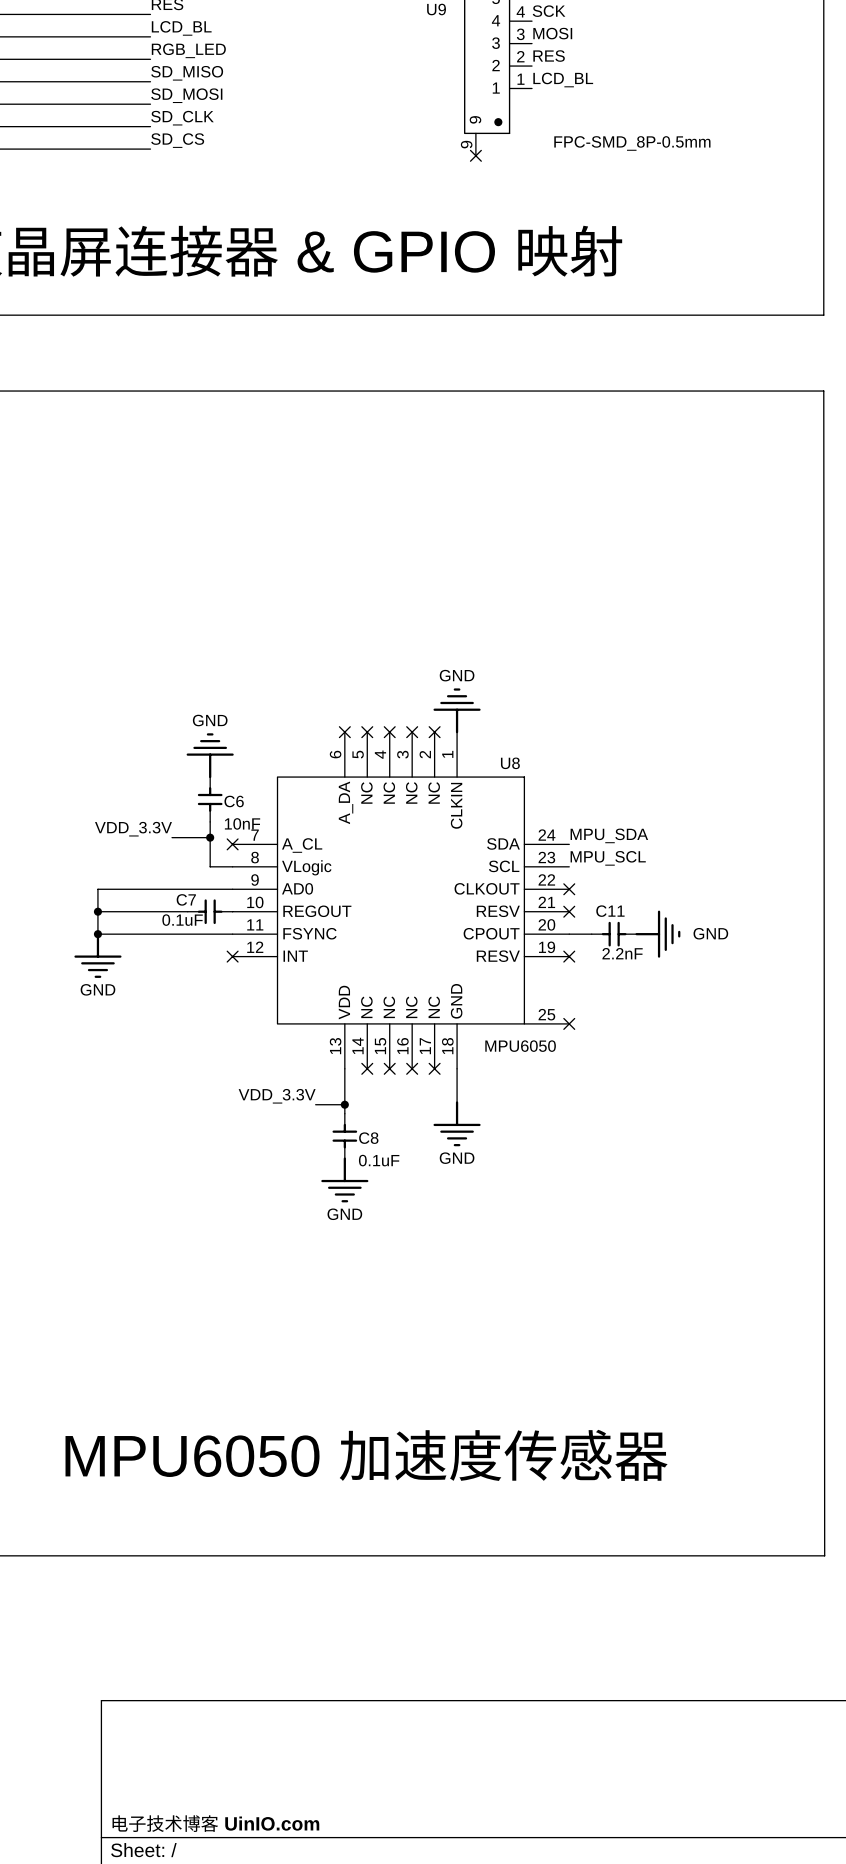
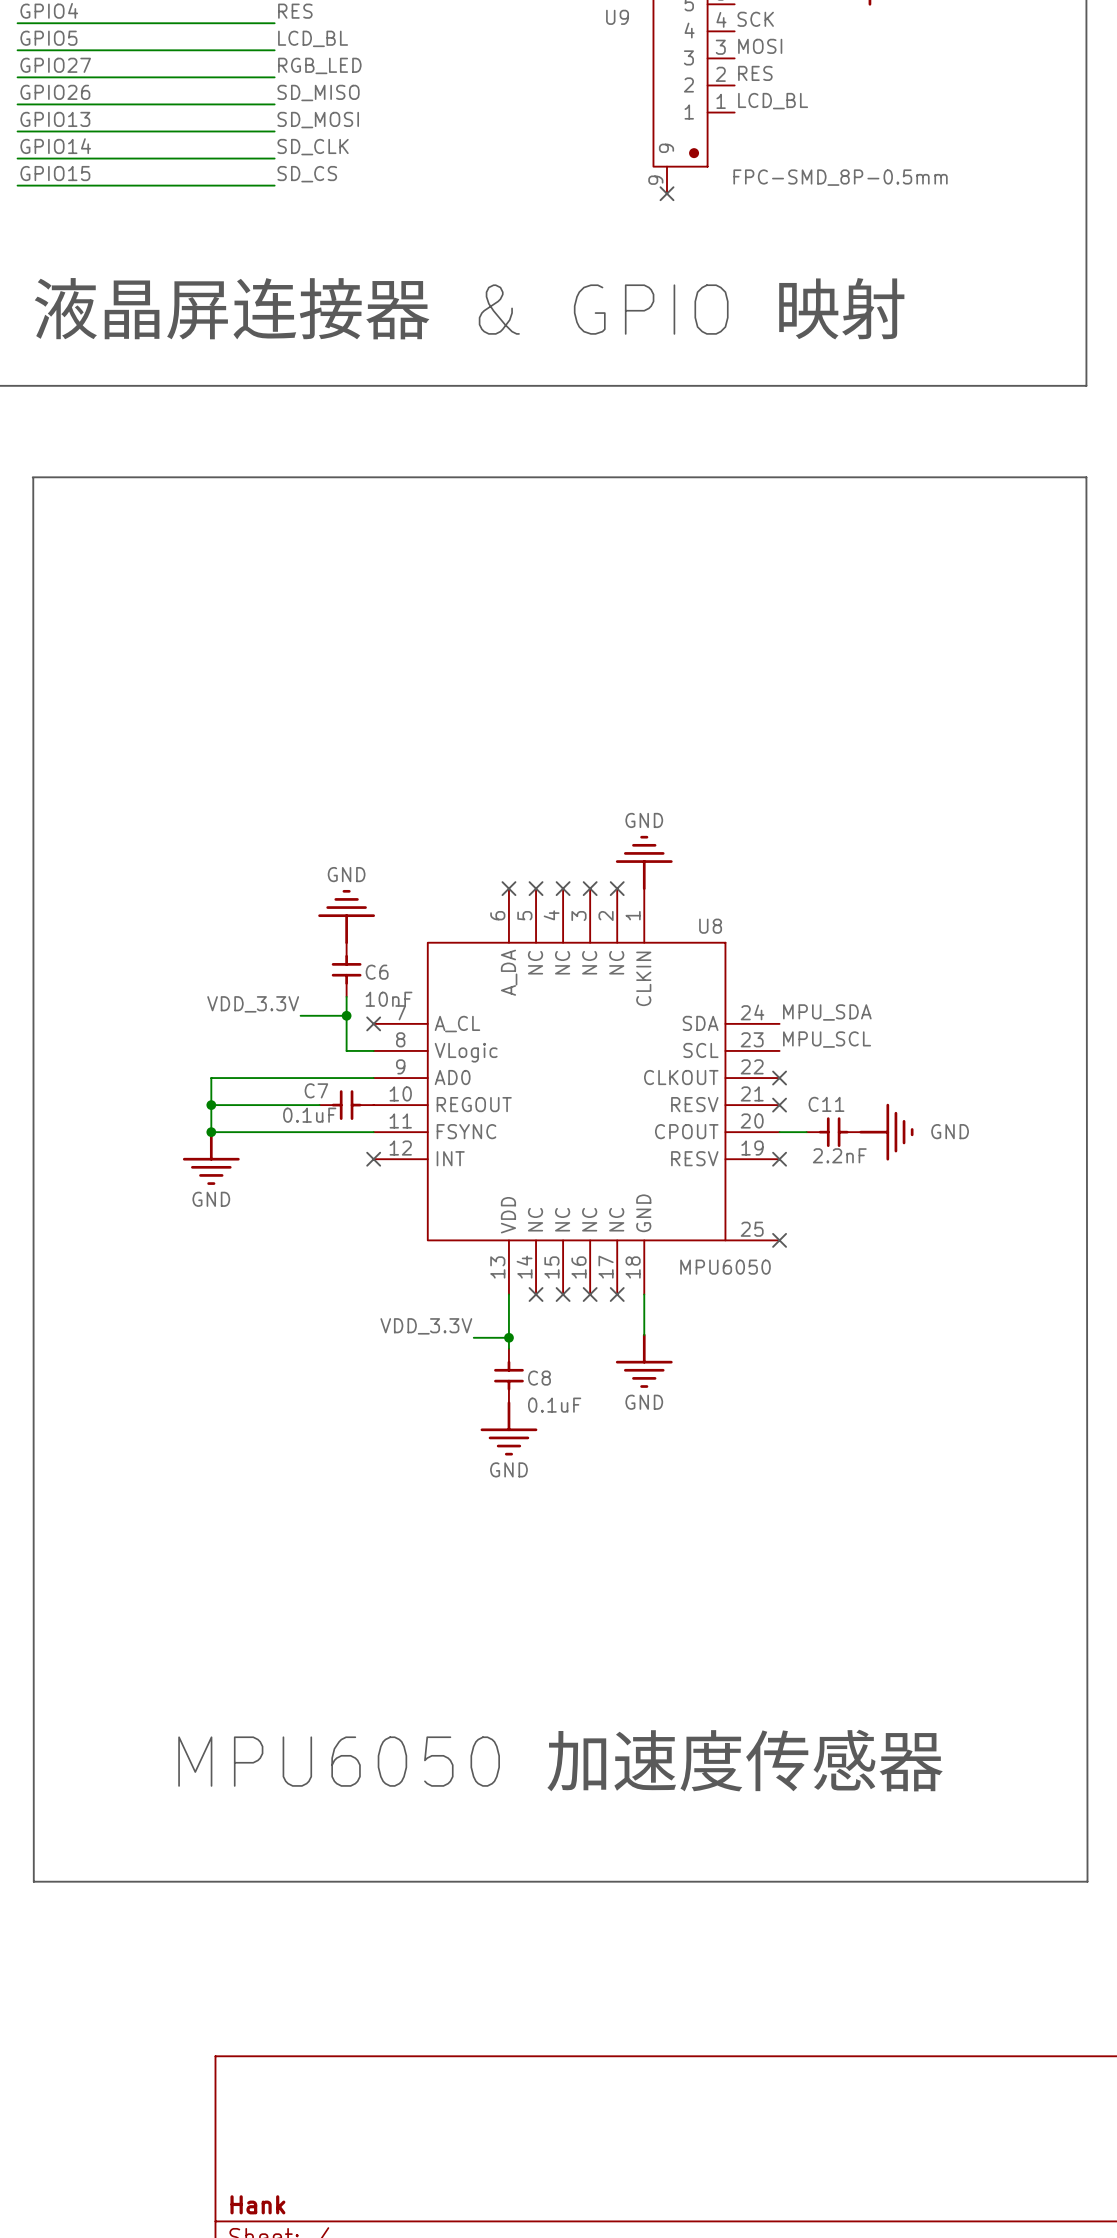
title block: 电子技术博客 UinIO.com (215, 1823) -> Hank (257, 2204)

